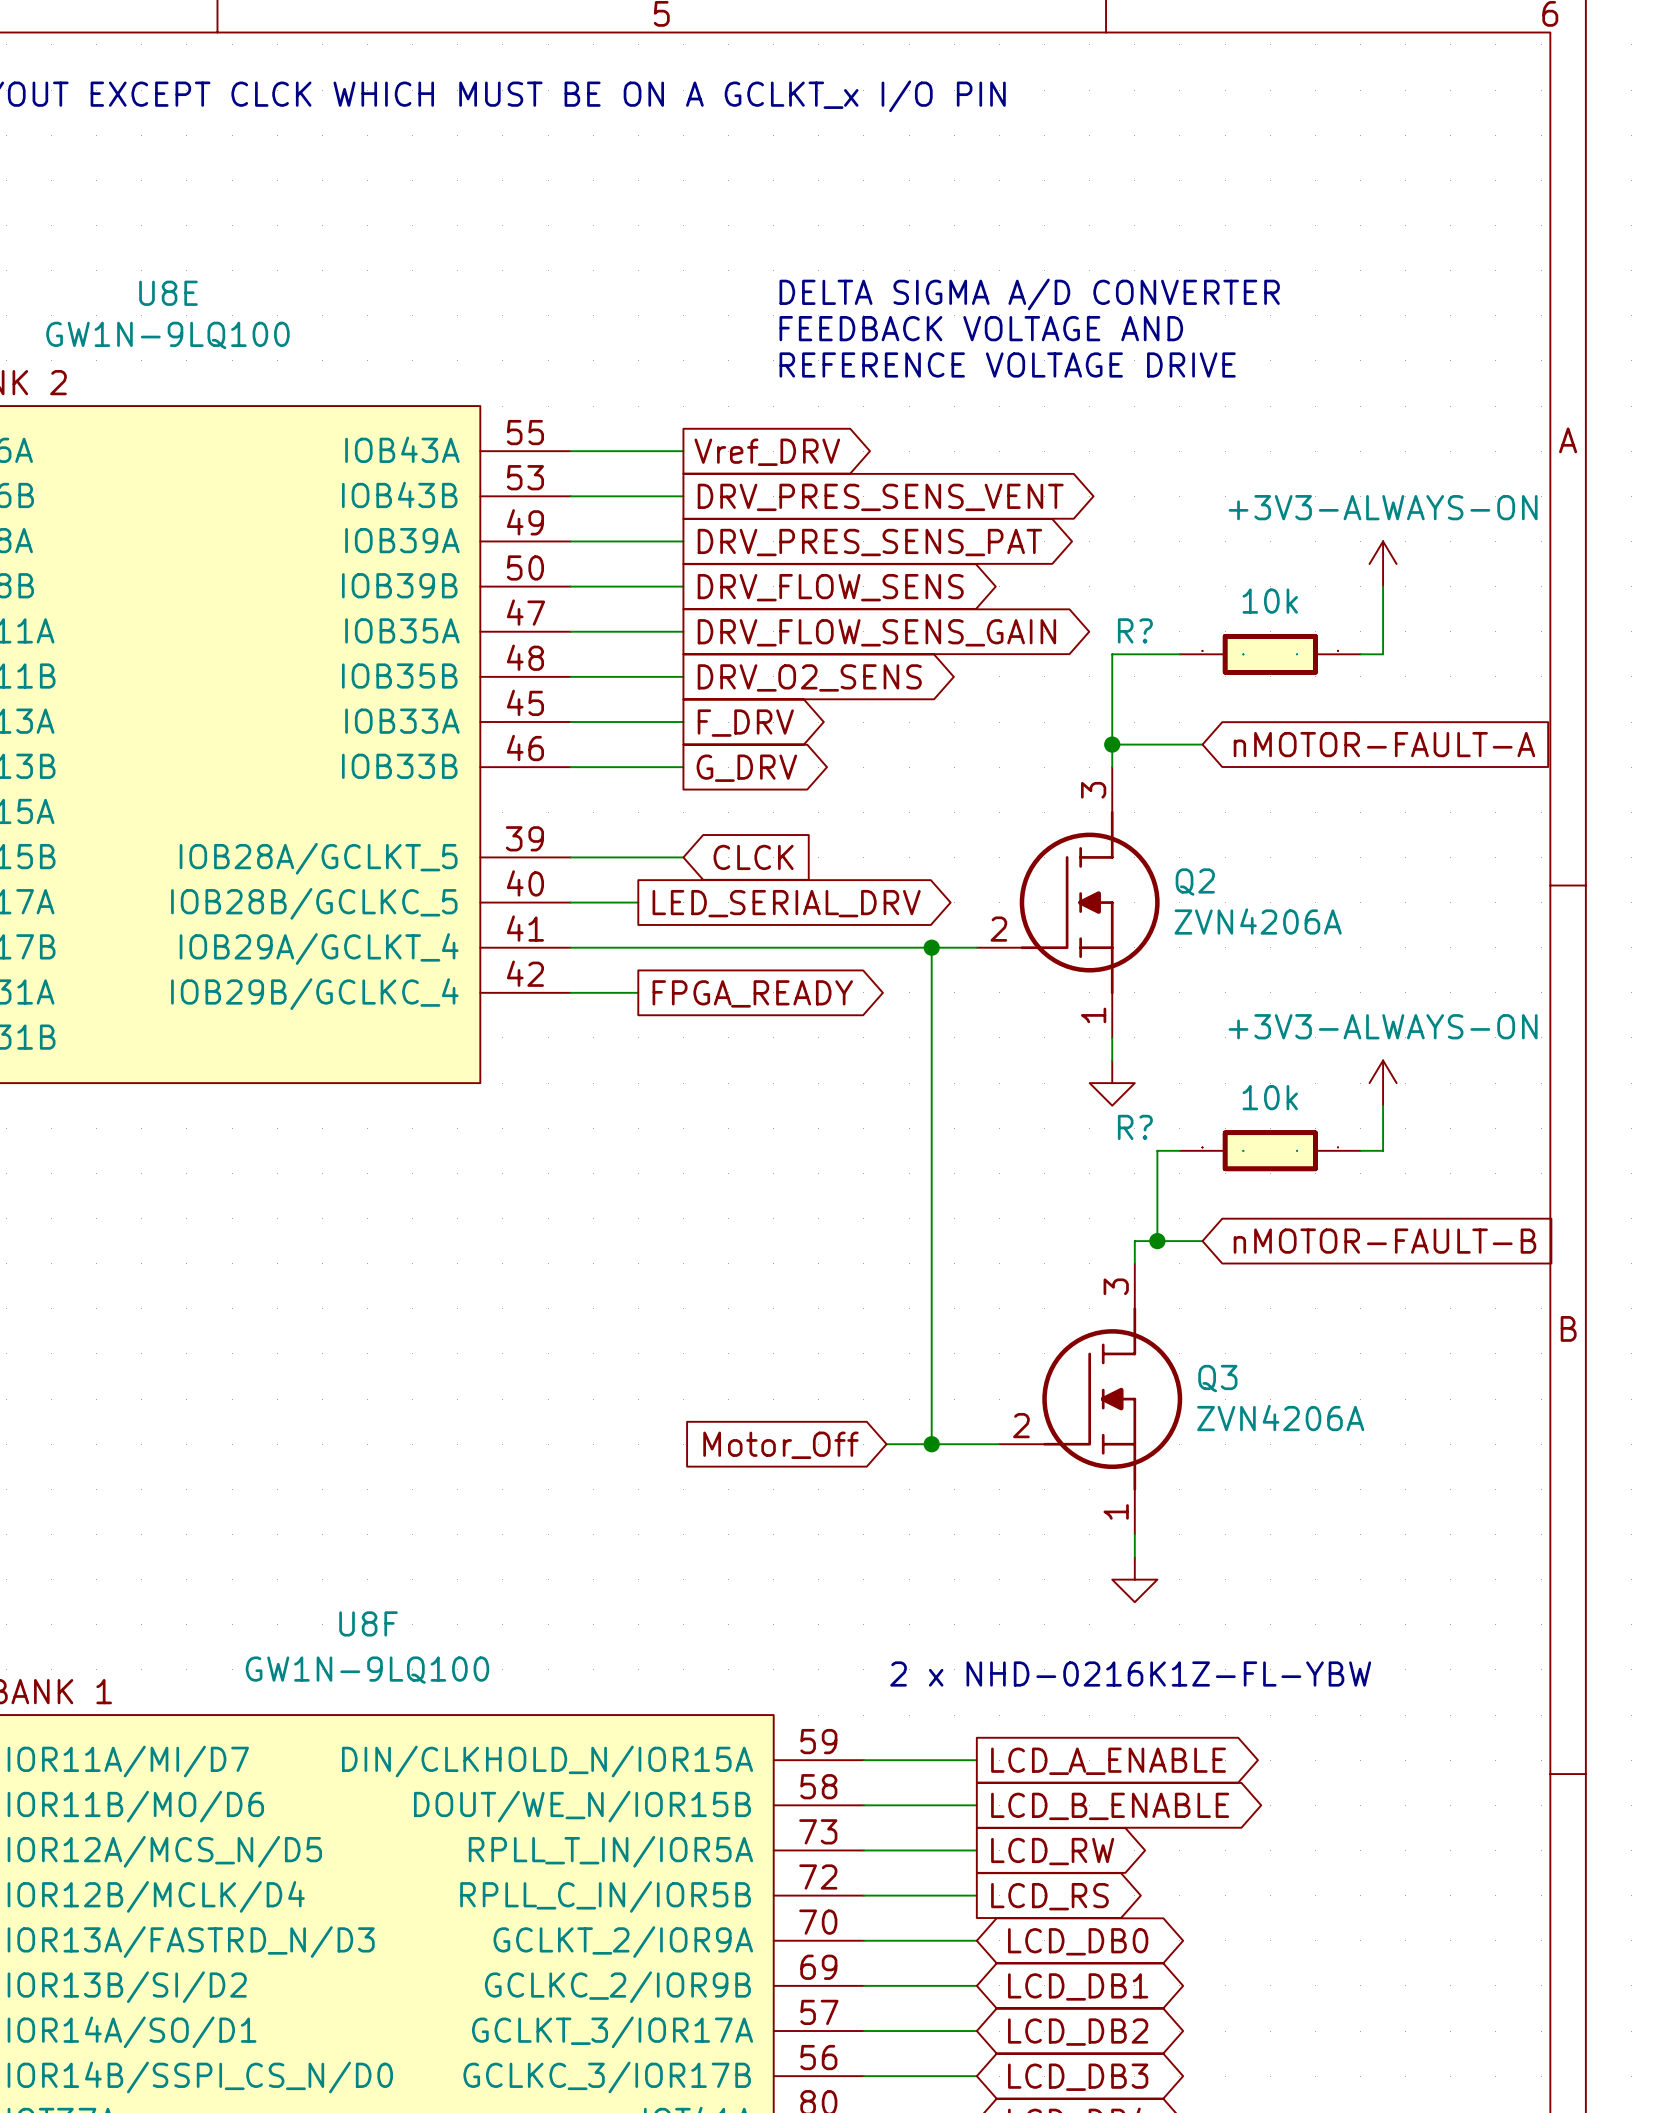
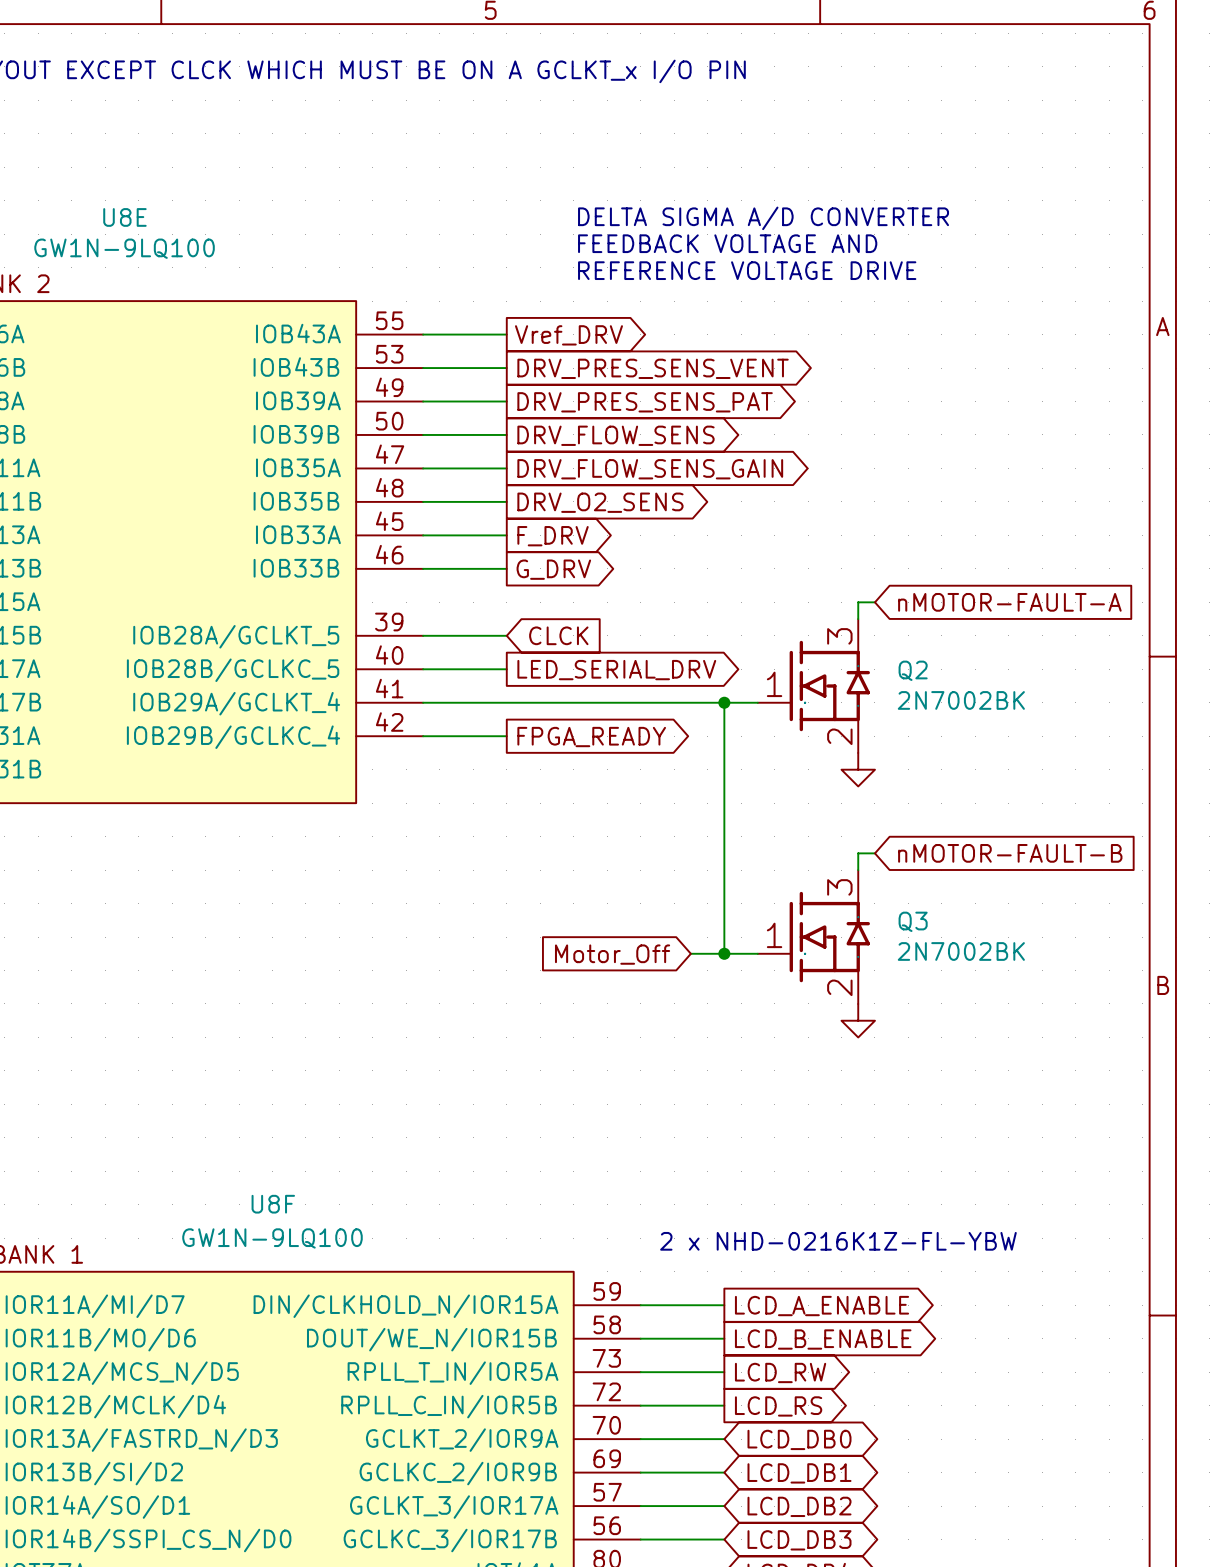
power symbol: +3V3-ALWAYS-ON (1383, 564) -> none
wire: (1383, 586) (1383, 654) (1360, 654) -> none
wire: (1179, 654) (1112, 654) (1112, 767) -> none
R?: (1270, 654) -> none
wire: (1112, 744) (1202, 744) -> none
junction: (1112, 744) -> none
global label position: nMOTOR-FAULT-A (1384, 744) -> nMOTOR-FAULT-A (1009, 602)
Q2 symbol: [976, 767, 1160, 1038] -> [757, 619, 870, 753]
wire: none -> (874, 602) (858, 602) (858, 619)
wire: none -> (473, 669) (506, 669)
global label position: LED_SERIAL_DRV (786, 903) -> LED_SERIAL_DRV (616, 670)
Q2 value: ZVN4206A (1258, 921) -> 2N7002BK (961, 700)
wire: (931, 947) (931, 1444) -> none
junction position: (931, 947) -> (724, 702)
wire: none -> (757, 702) (724, 702) (724, 953)
wire: none -> (473, 736) (506, 736)
global label position: FPGA_READY (752, 993) -> FPGA_READY (591, 737)
wire: (1112, 1037) (1112, 1060) -> none
power symbol position: (1112, 1083) -> (858, 769)
power symbol: +3V3-ALWAYS-ON (1383, 1083) -> none
wire: (1383, 1105) (1383, 1150) (1360, 1150) -> none
R?: (1270, 1150) -> none
junction: (1157, 1241) -> none
wire: (1202, 1241) (1134, 1241) (1134, 1263) -> none
global label position: nMOTOR-FAULT-B (1384, 1241) -> nMOTOR-FAULT-B (1010, 853)
Q3 symbol: [999, 1263, 1183, 1535] -> [757, 870, 870, 1004]
wire: none -> (690, 953) (757, 953)
junction: none -> (724, 953)
power symbol: none -> (858, 1020)
Q3 value: ZVN4206A (1280, 1418) -> 2N7002BK (961, 951)
wire: (886, 1444) (999, 1444) -> none
junction: (931, 1444) -> none
global label position: Motor_Off (780, 1445) -> Motor_Off (612, 954)
wire: (1134, 1534) (1134, 1557) -> none
power symbol: (1134, 1579) -> none

